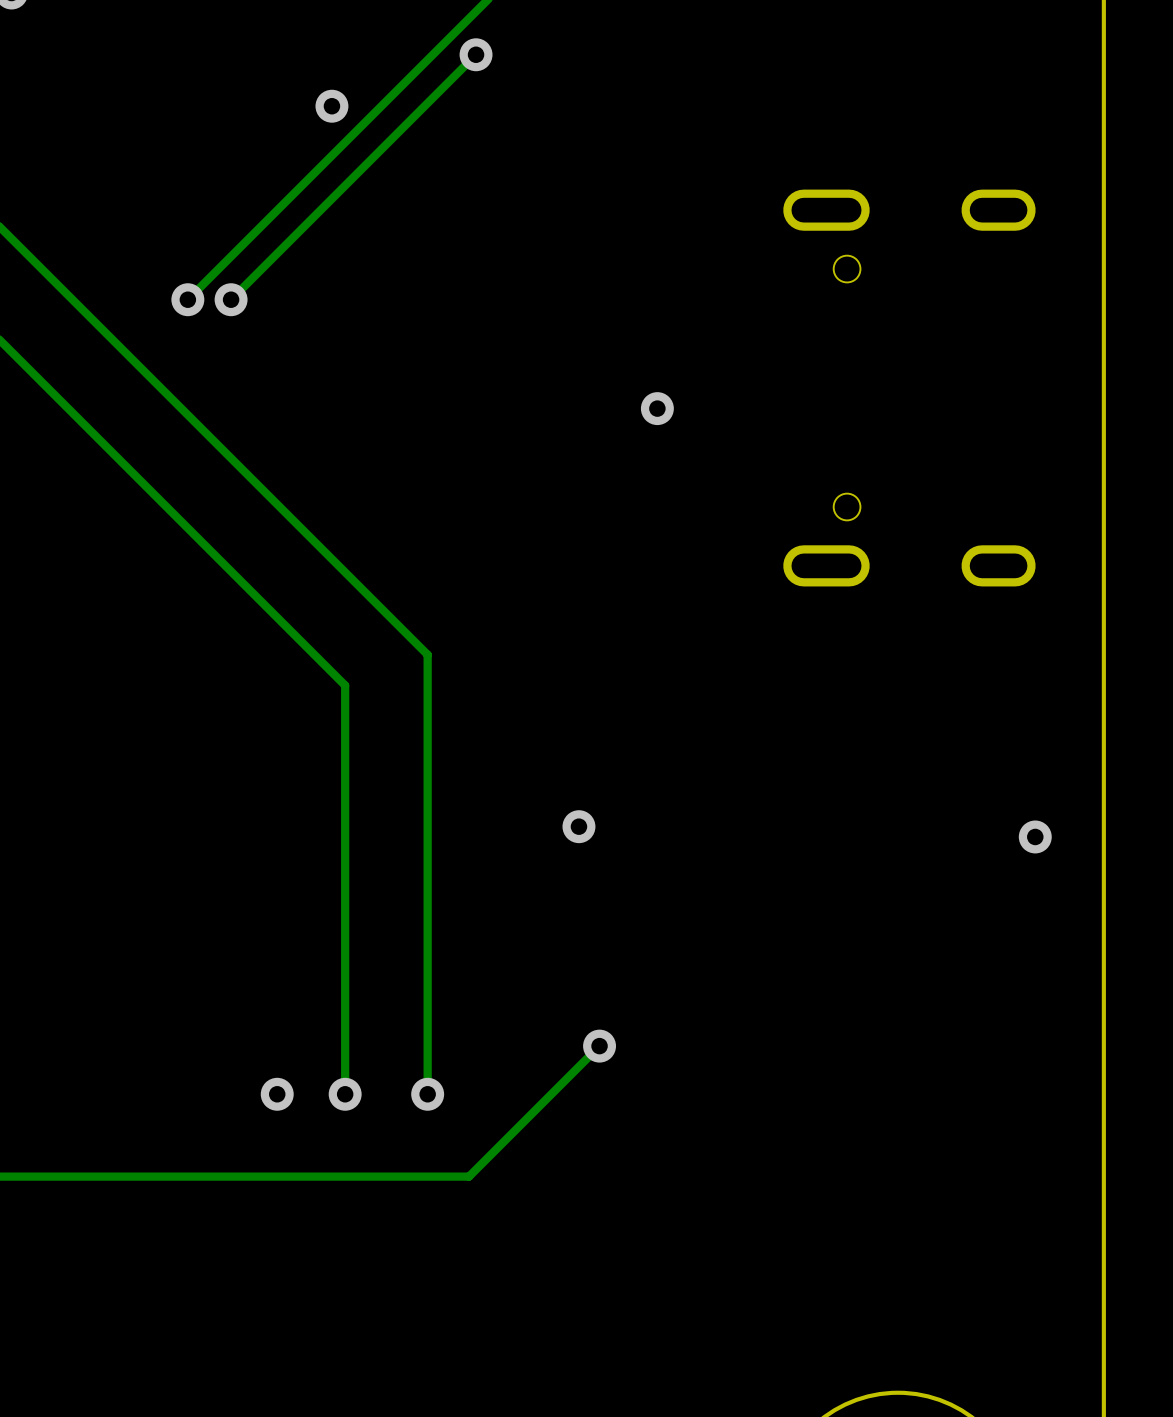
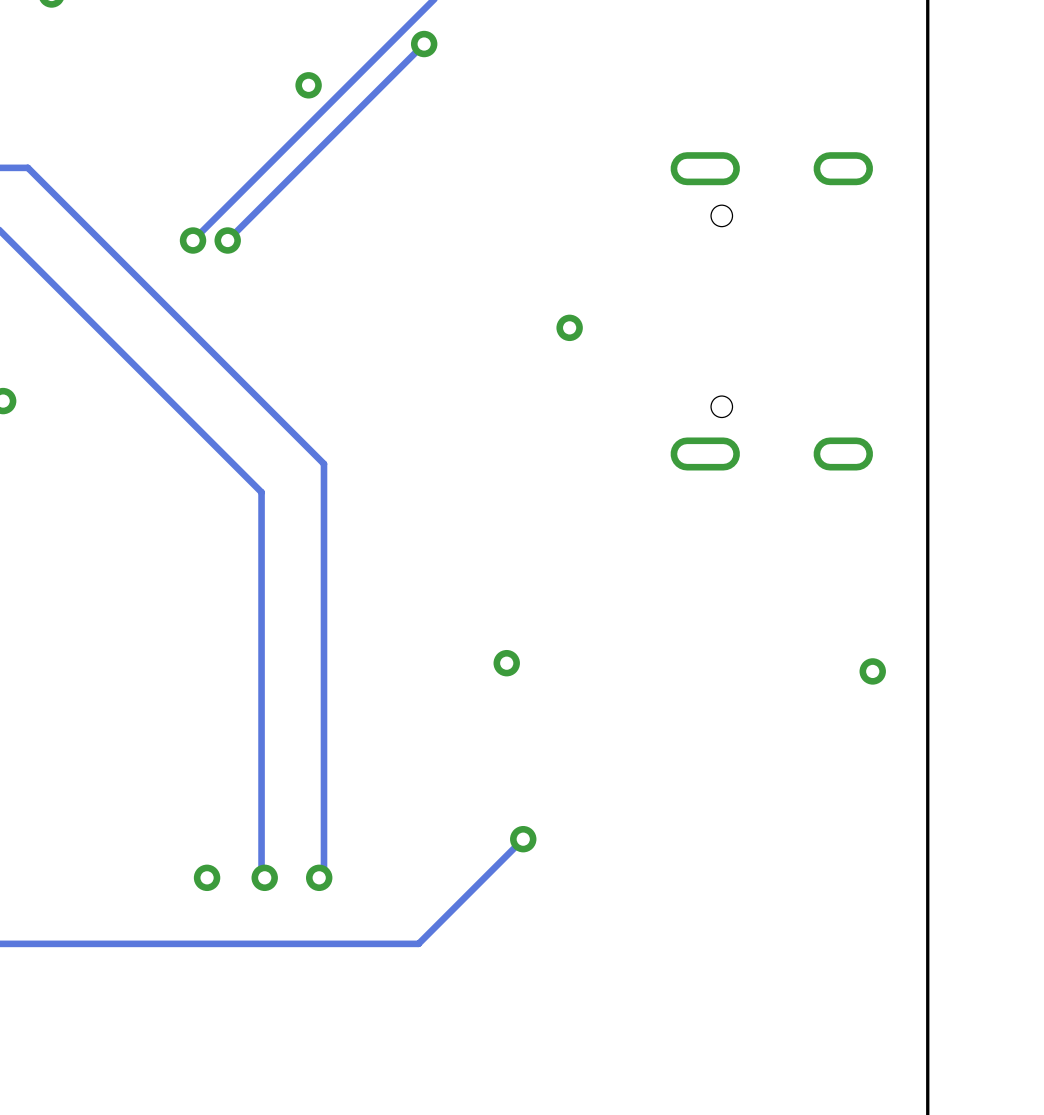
track: (351, 578) (427, 654) (427, 1094) -> (323, 463) (323, 877)
track: (273, 613) (345, 685) (345, 1094) -> (261, 492) (261, 877)
via position: (427, 1094) -> (207, 877)

